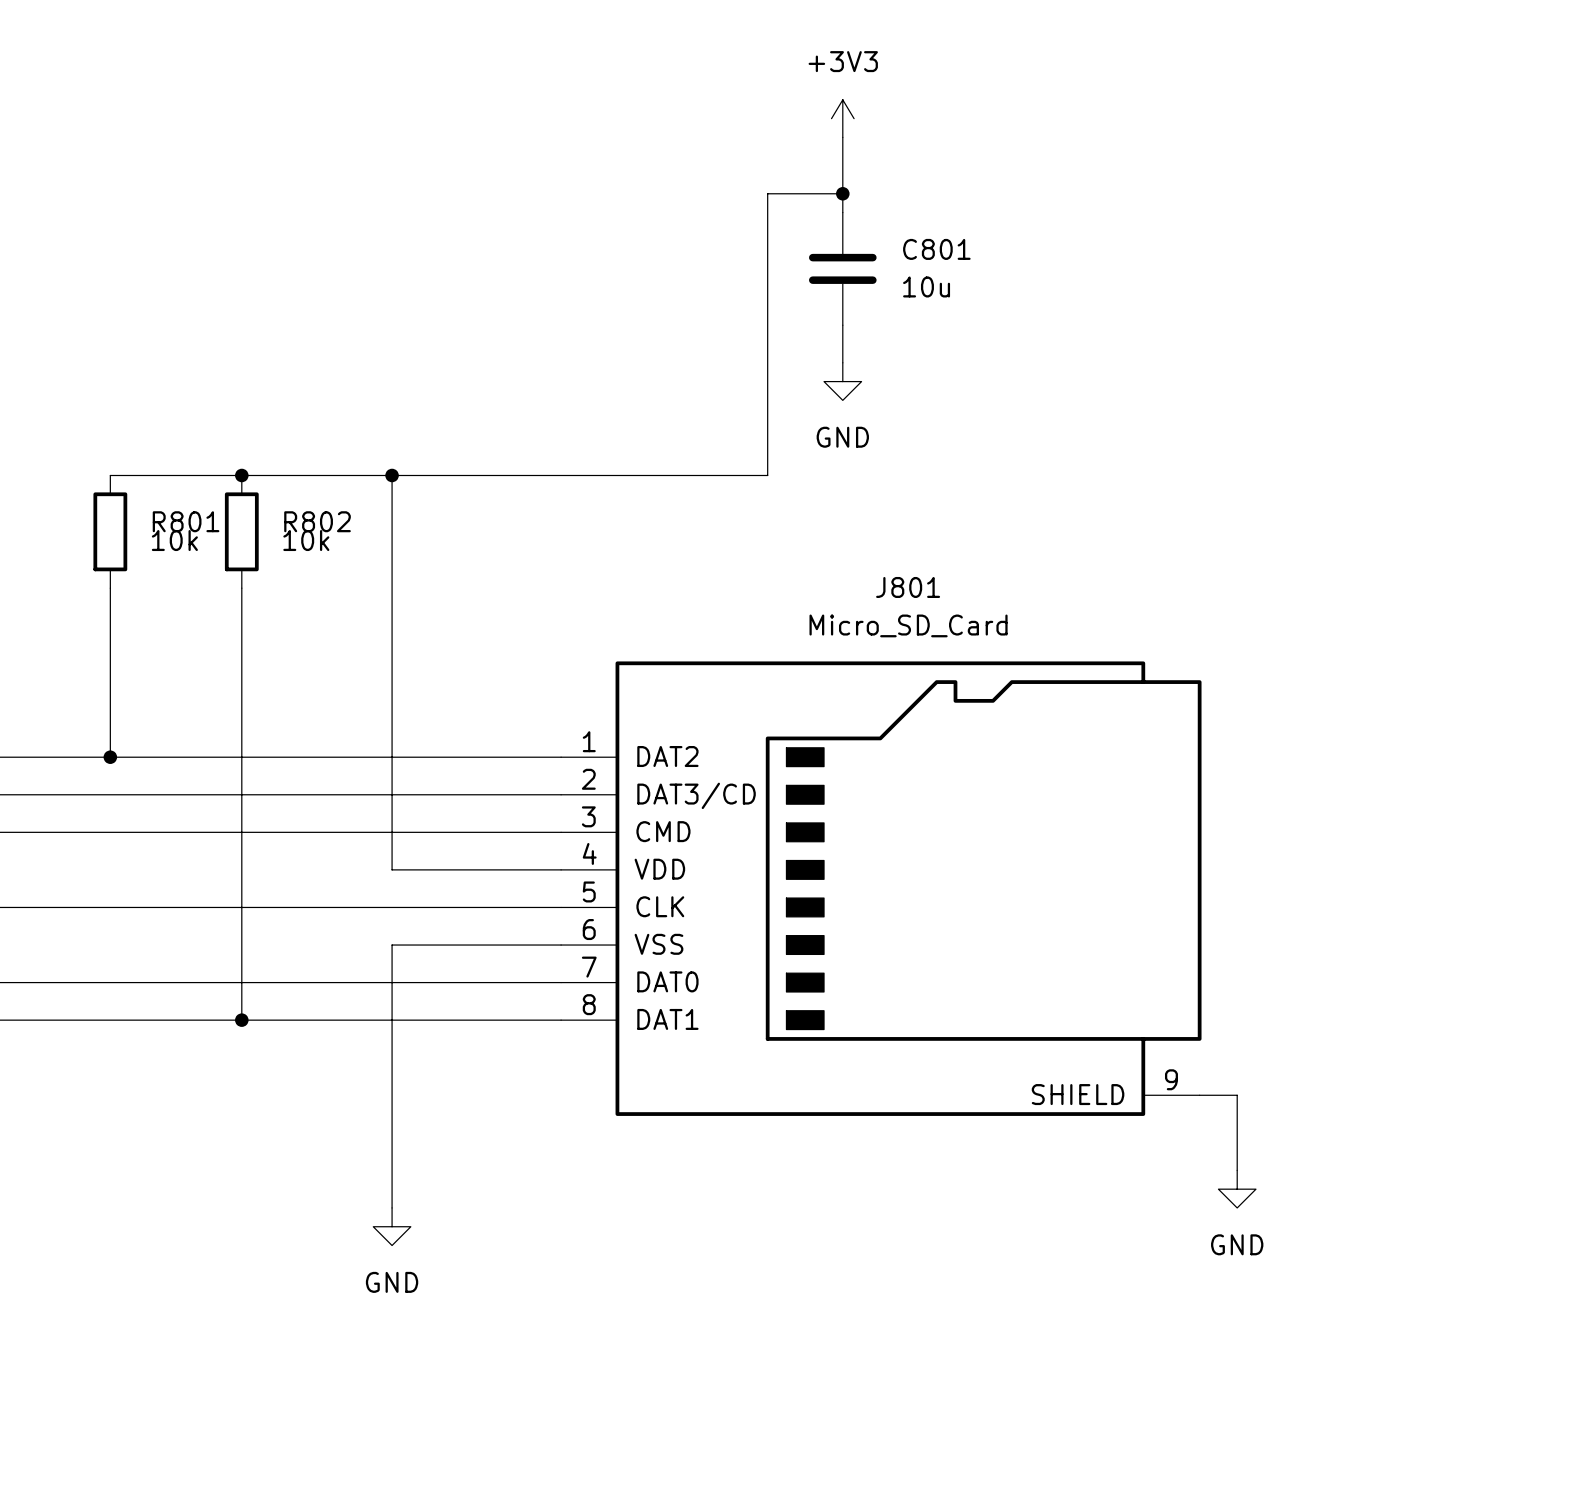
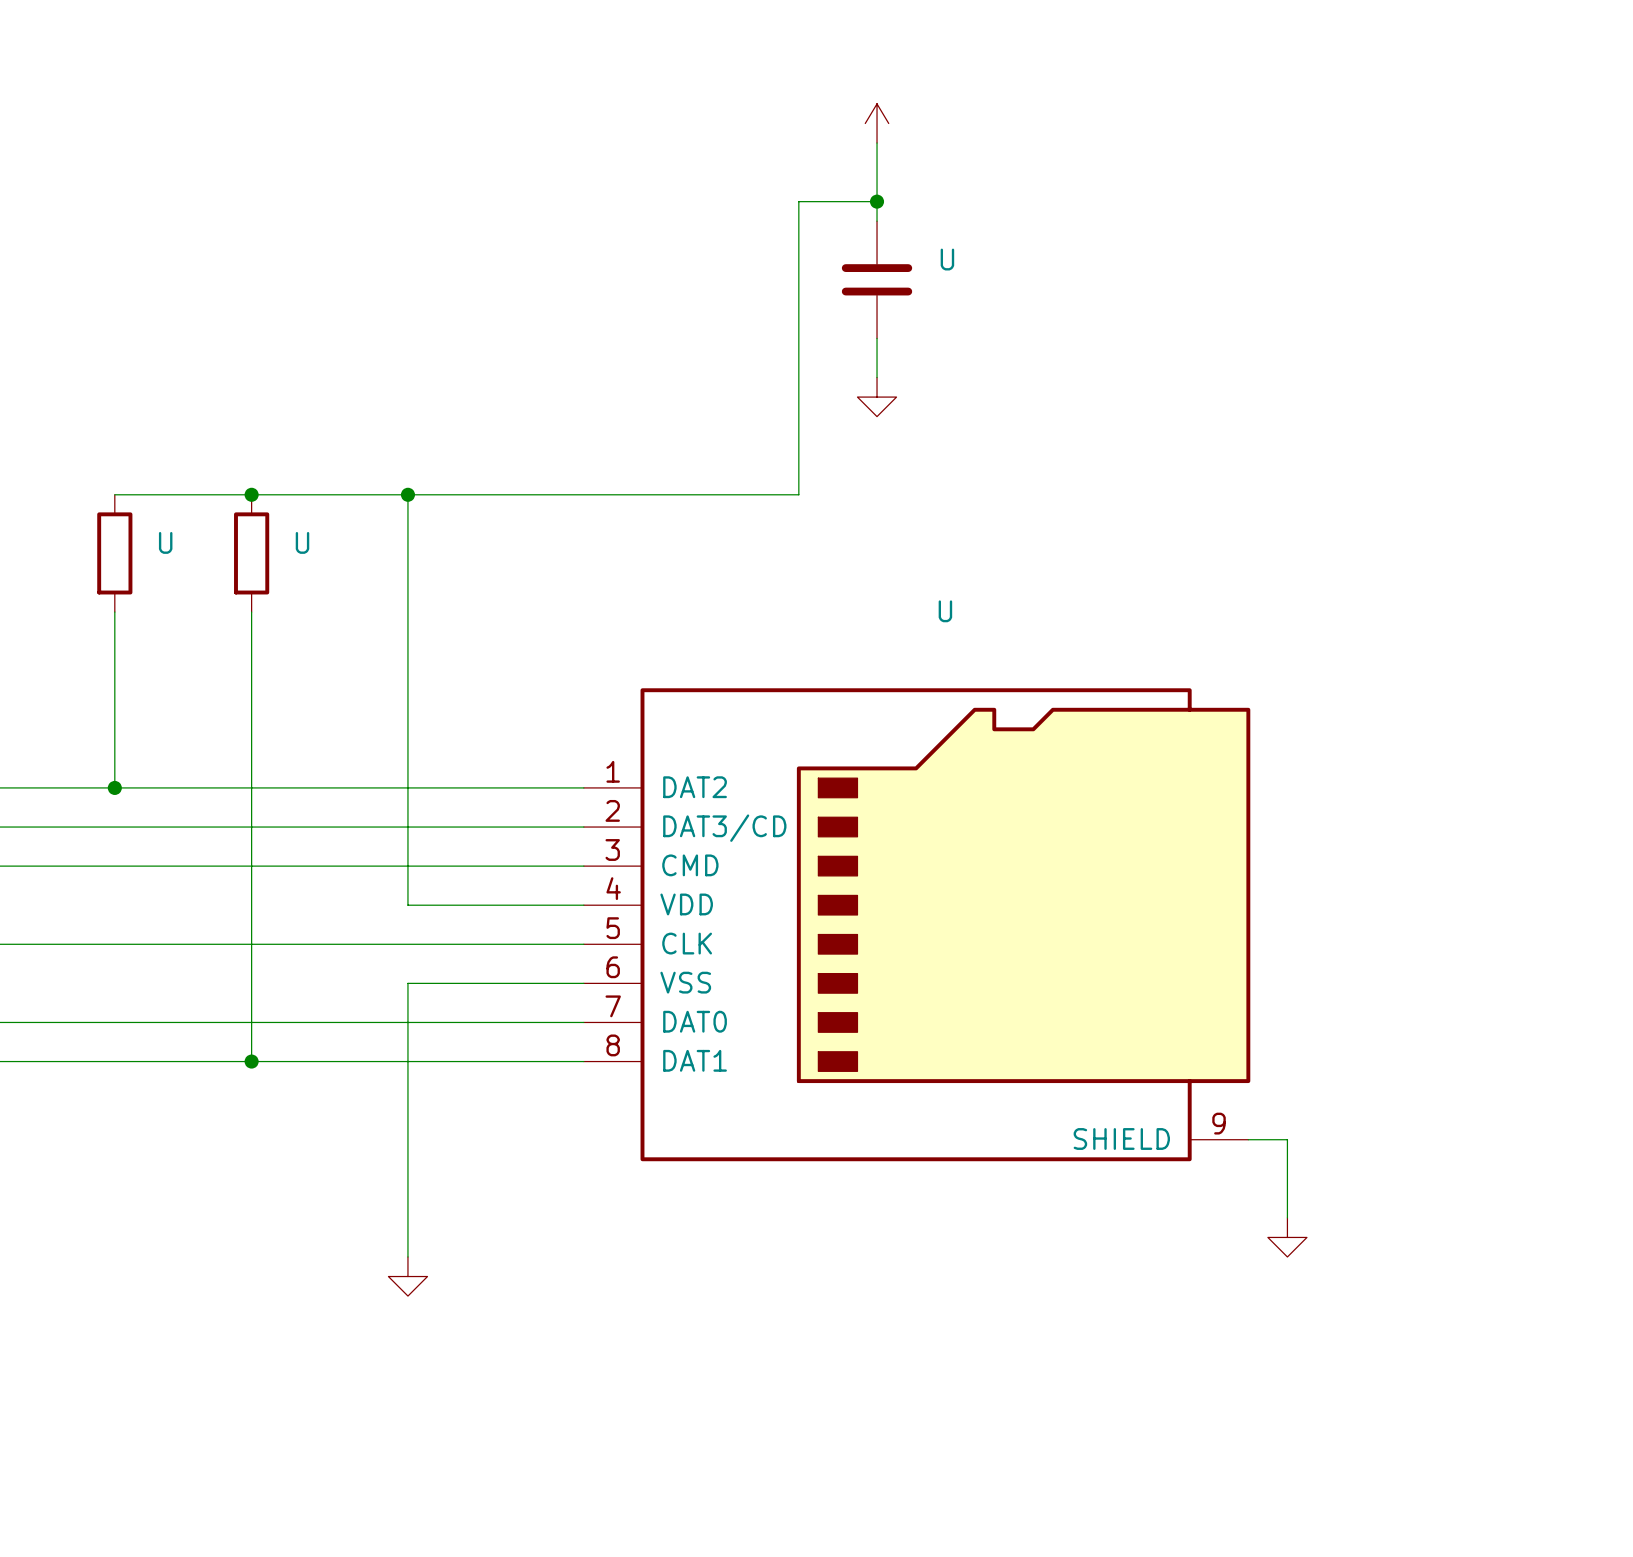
power symbol text: +3V3 (843, 61) -> none
C801 name: C801 (936, 249) -> U (947, 259)
C801 value: 10u (926, 286) -> none
power symbol text: GND (842, 437) -> none
R801 name: R801 (186, 521) -> U (165, 542)
R802 name: R802 (317, 521) -> U (302, 542)
R801 value: 10k (174, 540) -> none
R802 value: 10k (306, 540) -> none
J801 name: J801 (908, 587) -> U (945, 611)
J801 value: Micro_SD_Card (908, 625) -> none
power symbol text: GND (1237, 1244) -> none
power symbol text: GND (392, 1282) -> none

